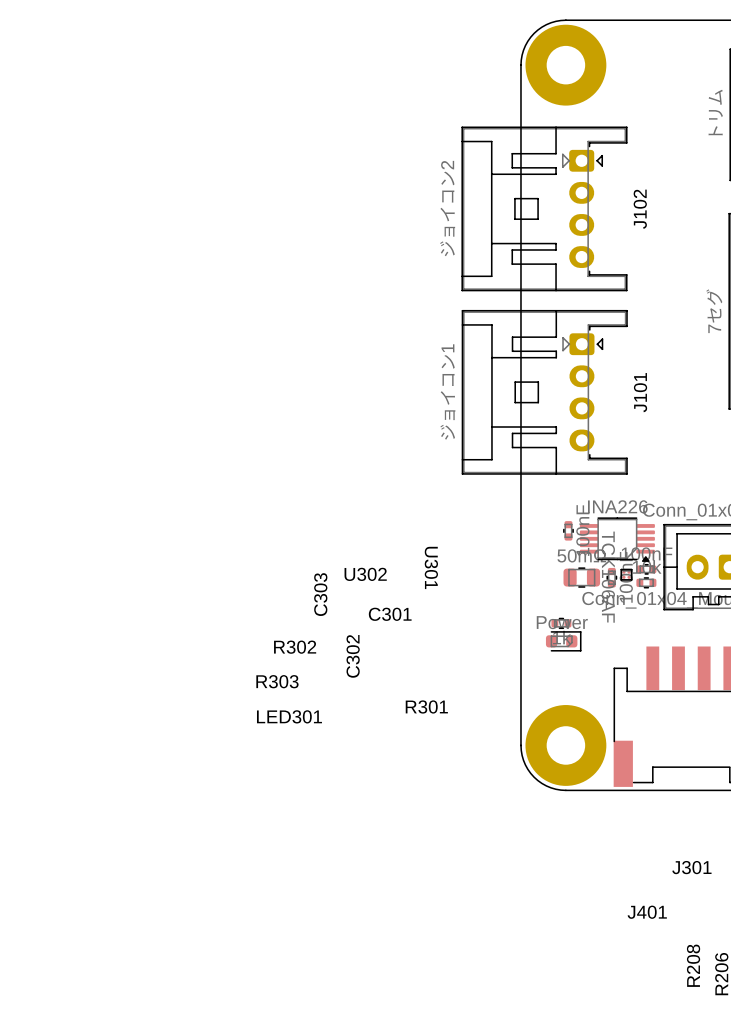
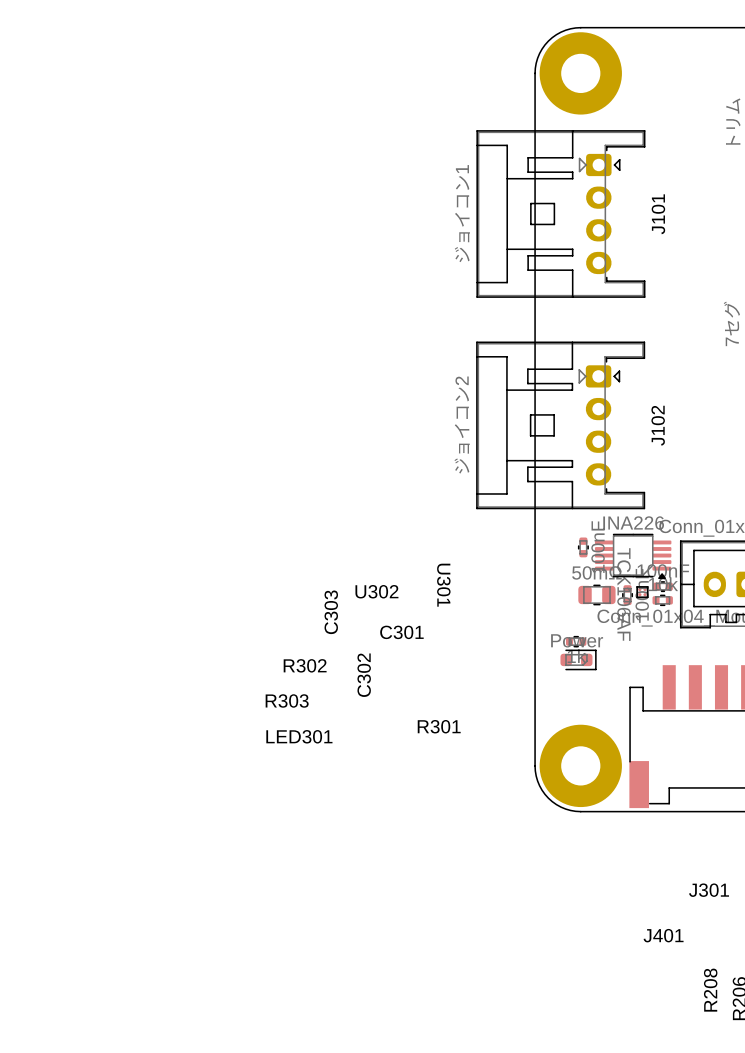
J102 position: (544, 208) -> (560, 425)
J101 position: (544, 392) -> (560, 213)

